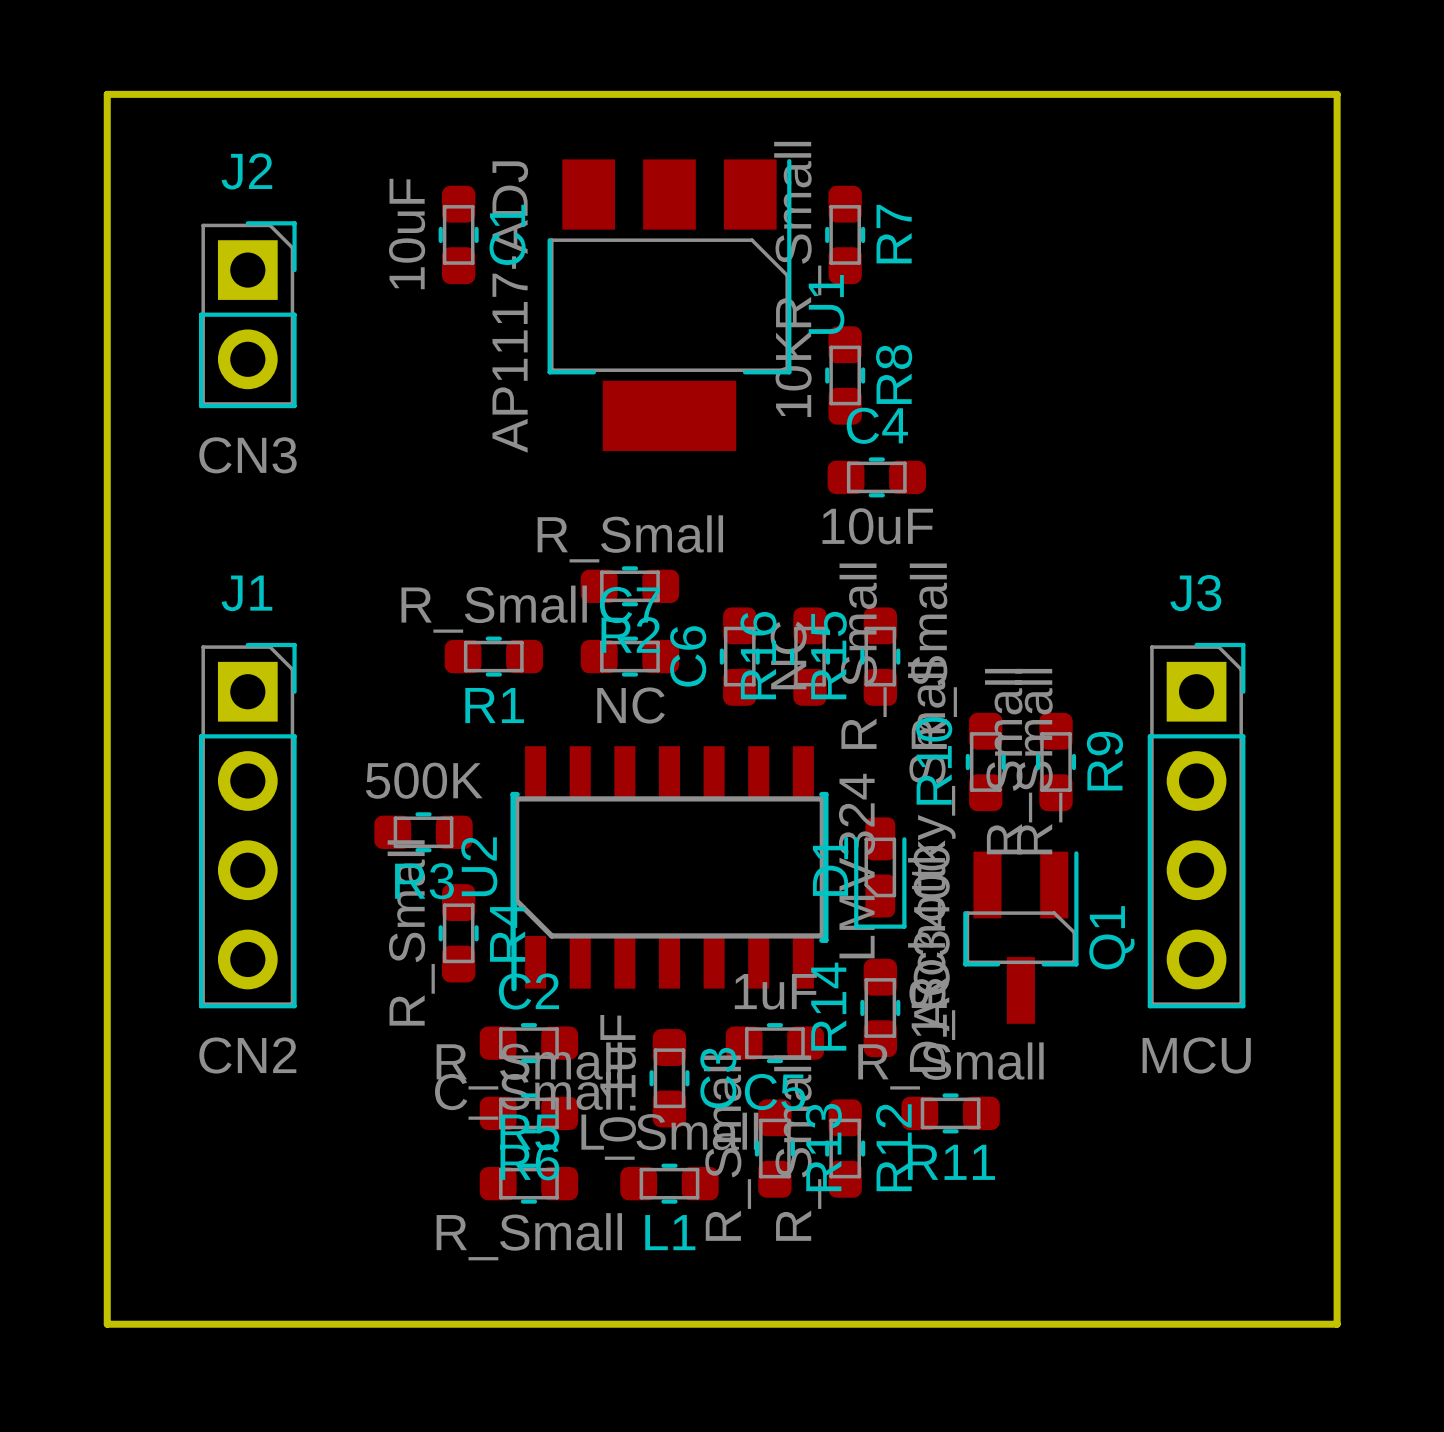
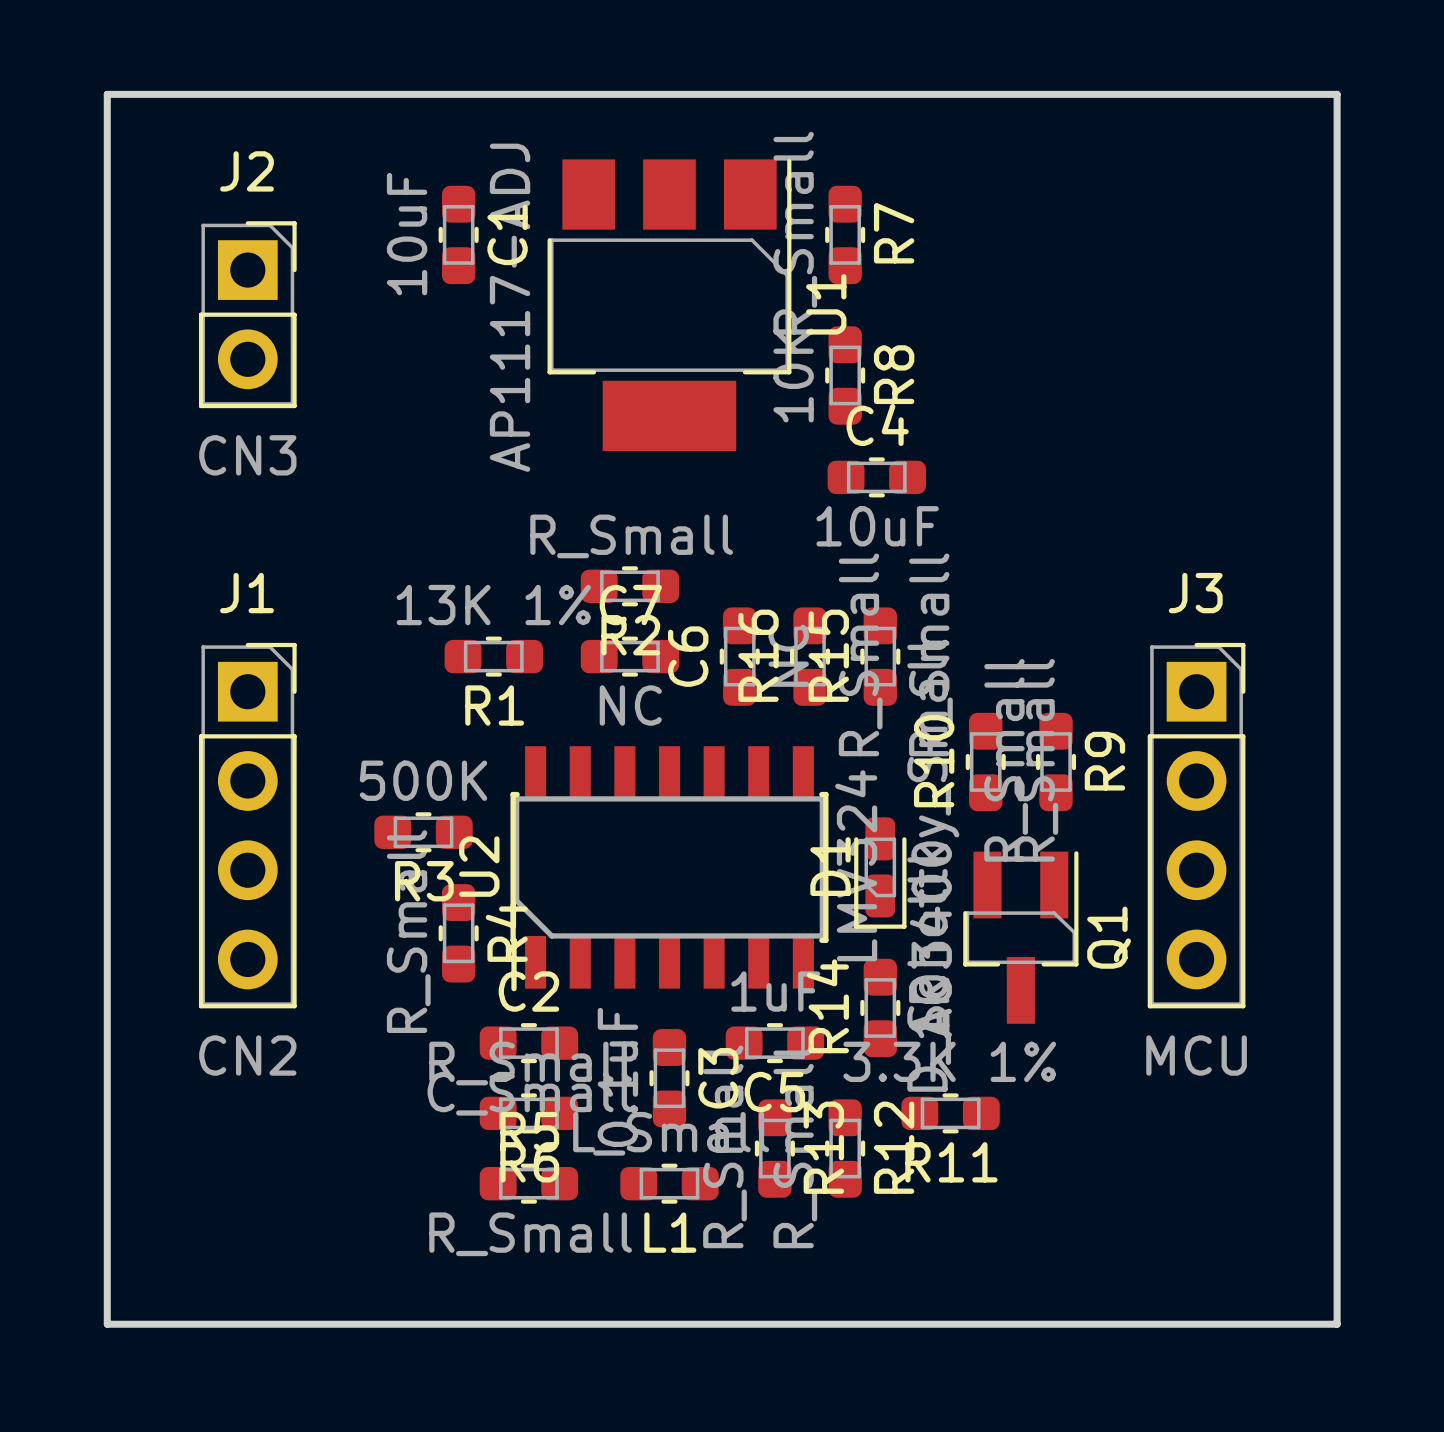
R1 value: R_Small (494, 609) -> 13K 1% (493, 605)
R11 value: R_Small (950, 1065) -> 3.3K 1% (949, 1061)

